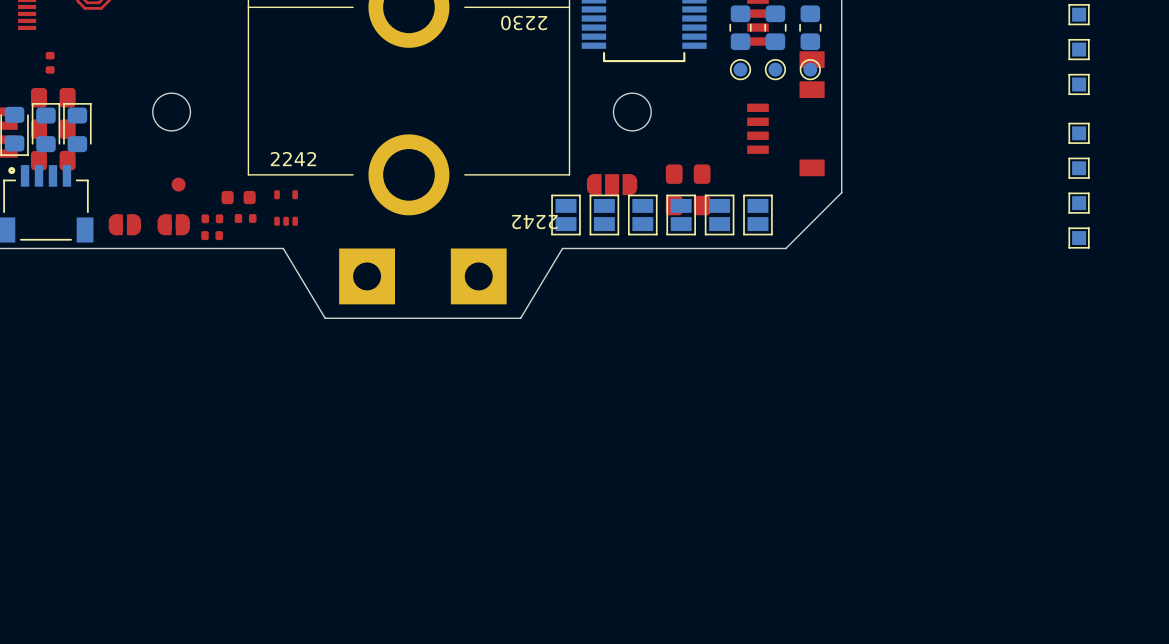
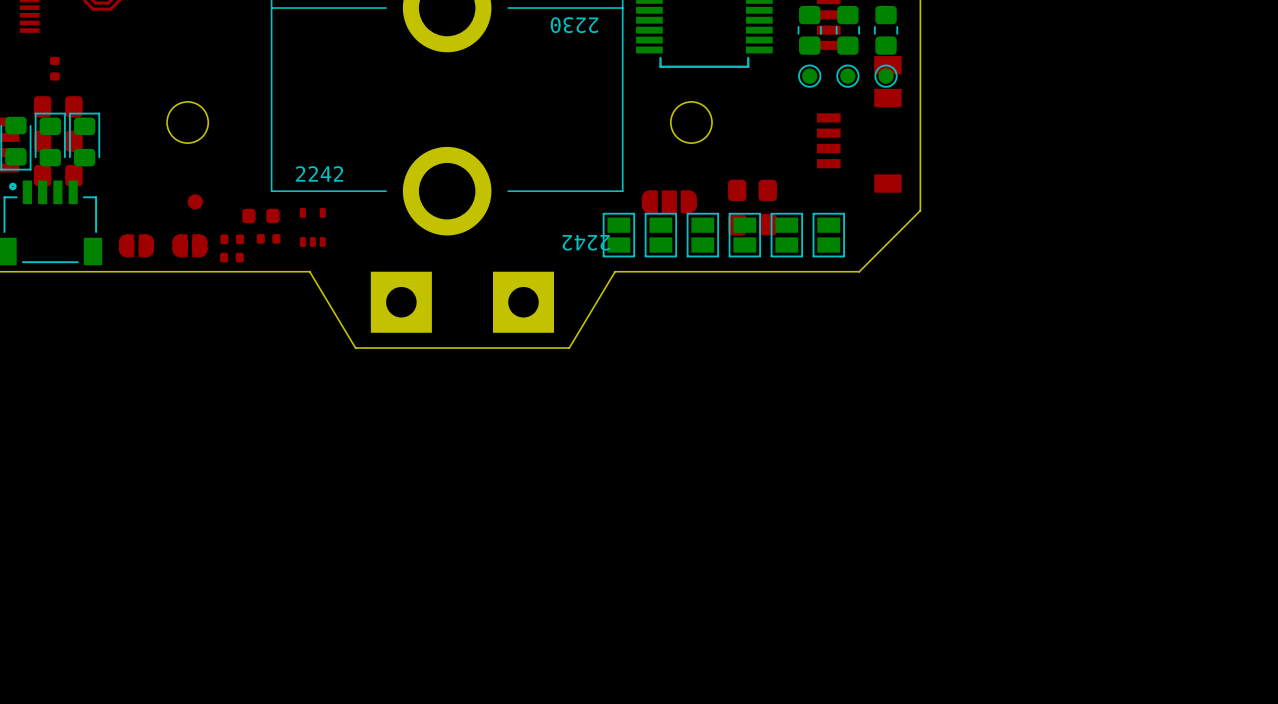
part: (1079, 14) -> none
part: (1079, 49) -> none
part: (1079, 84) -> none
part: (1079, 133) -> none
part: (1079, 168) -> none
part: (1079, 203) -> none
part: (1079, 238) -> none

